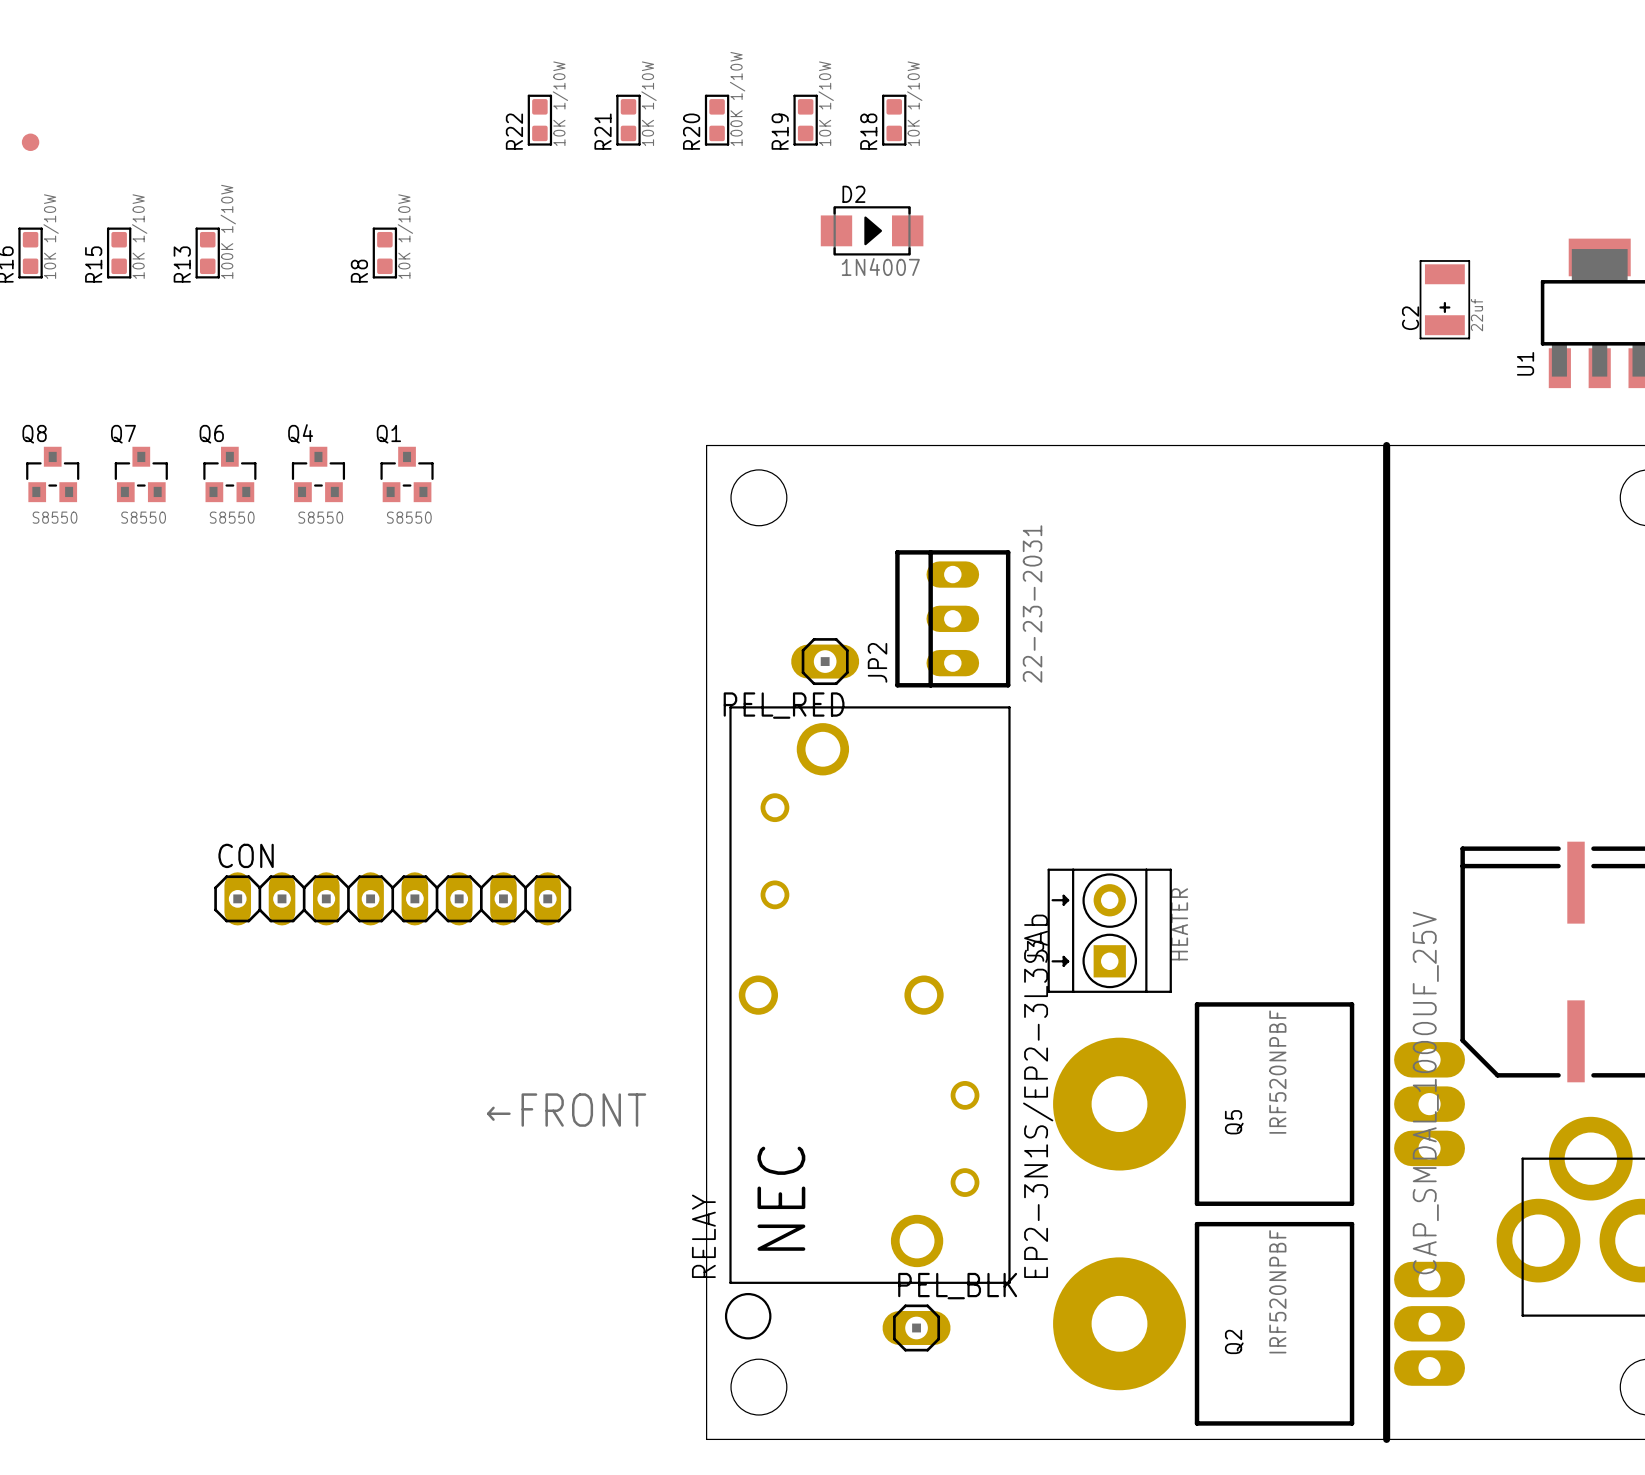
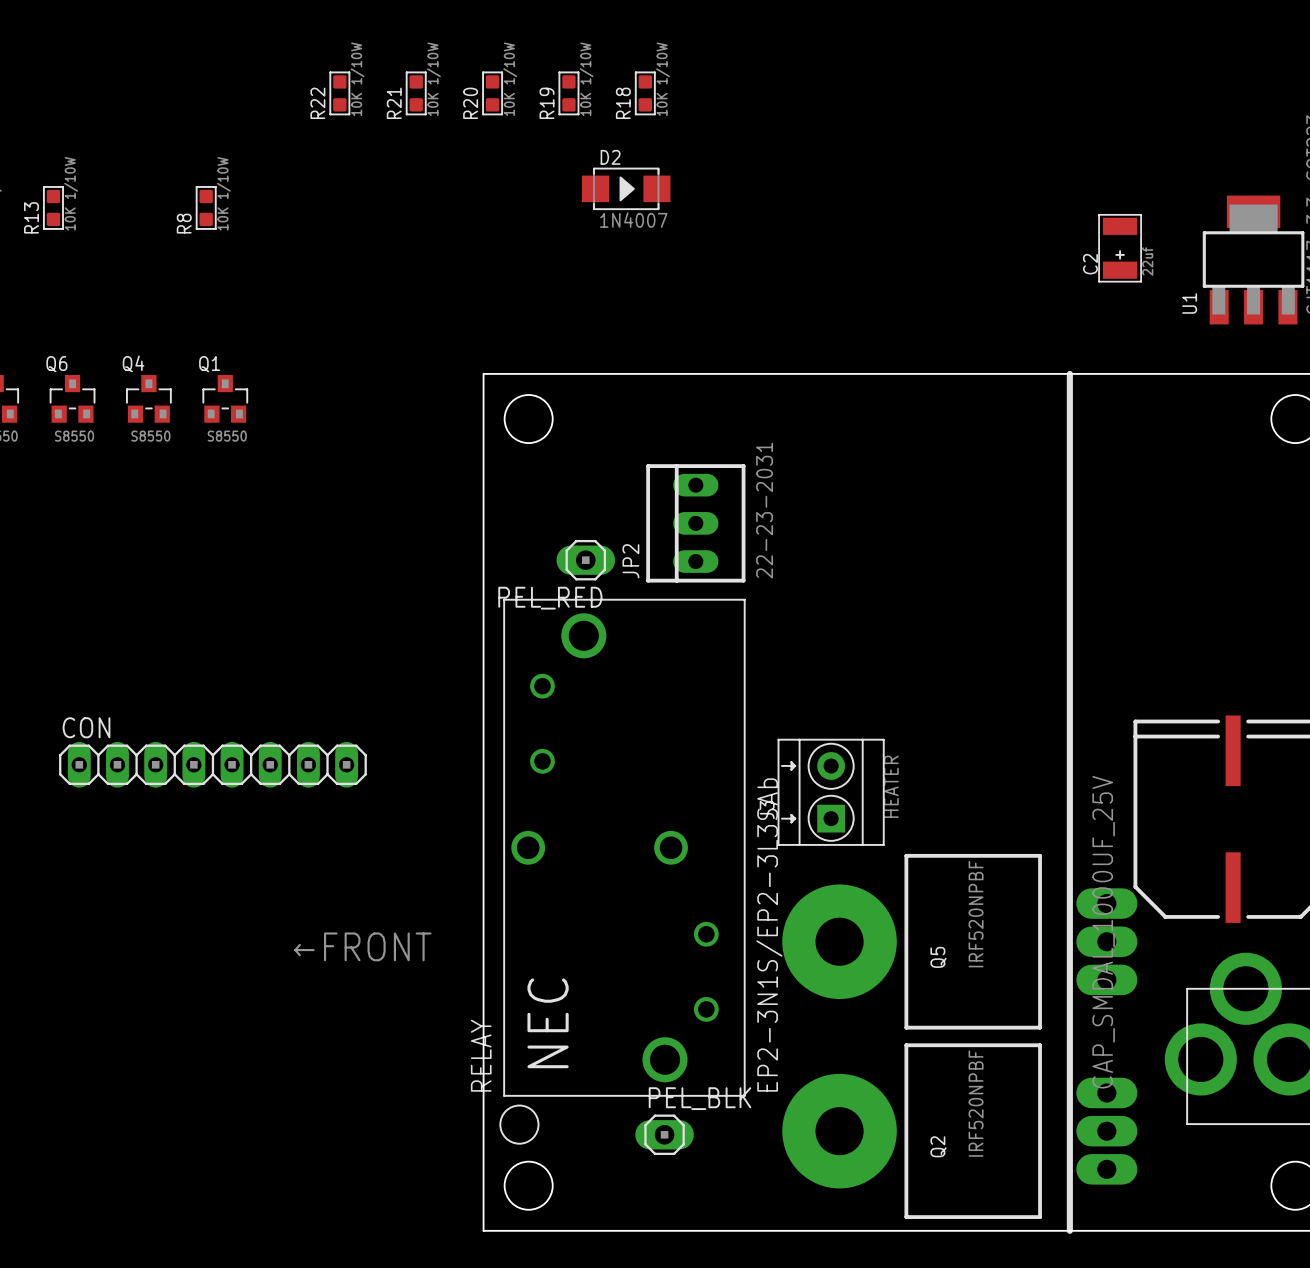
R20 value: 100K 1/10W (737, 98) -> 10K 1/10W (510, 79)
R13 value: 100K 1/10W (228, 231) -> 10K 1/10W (71, 193)

